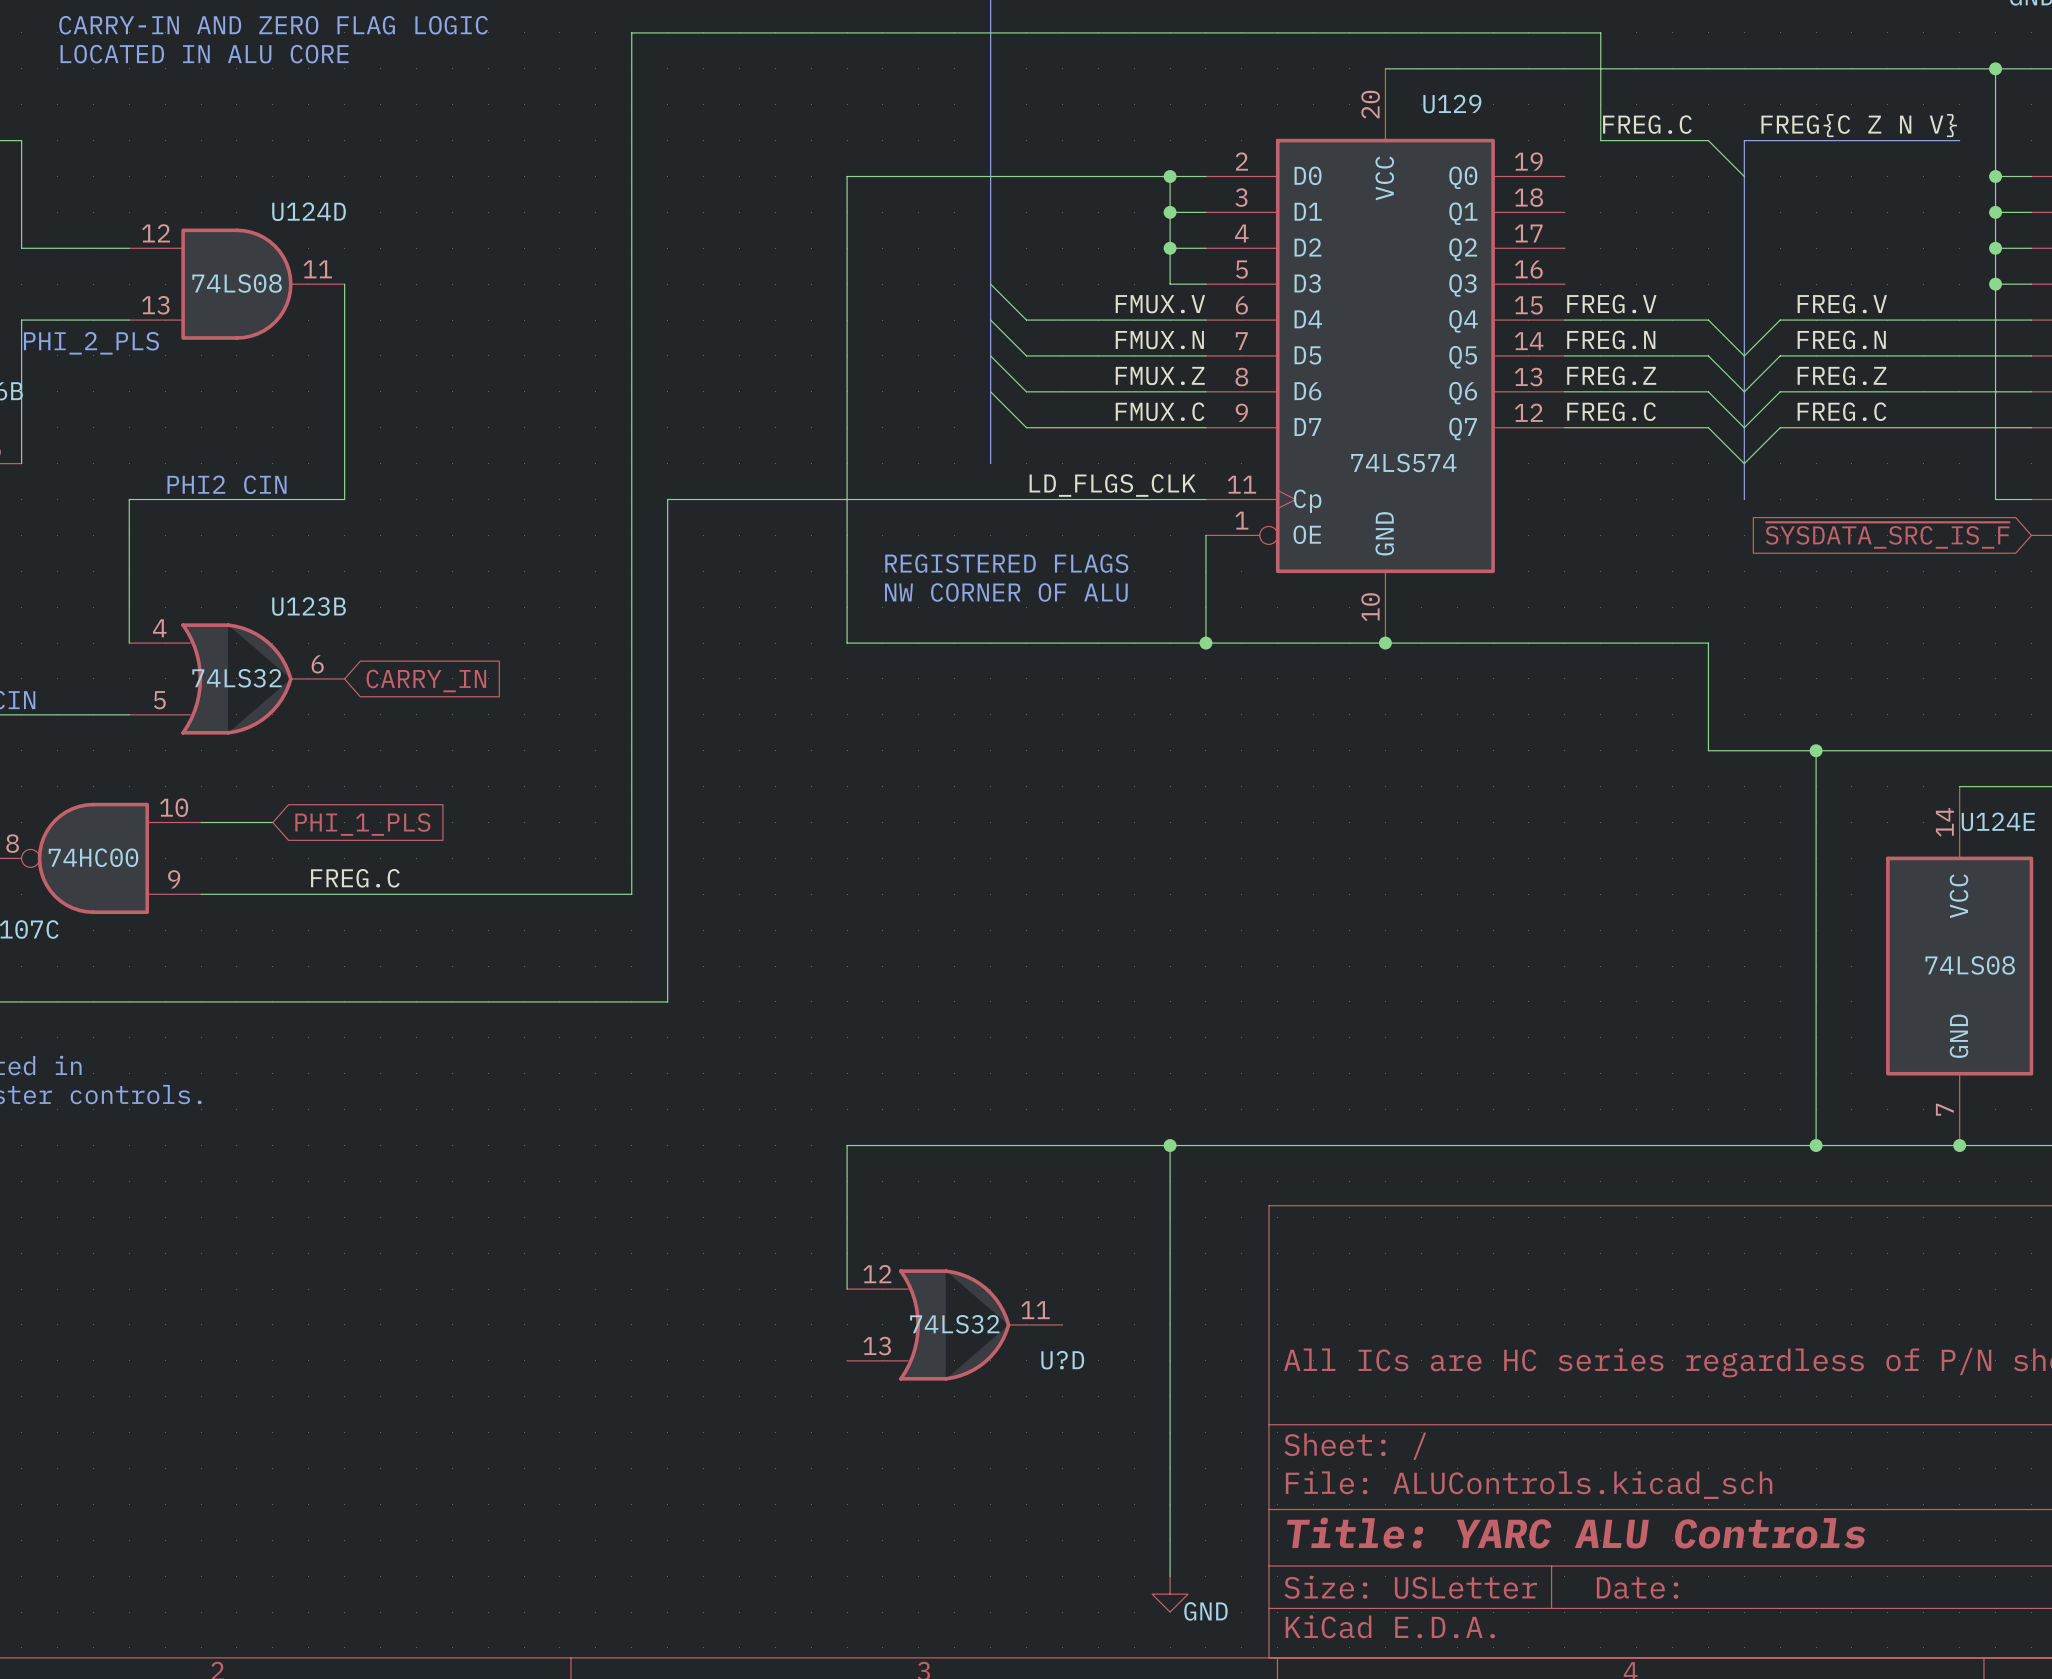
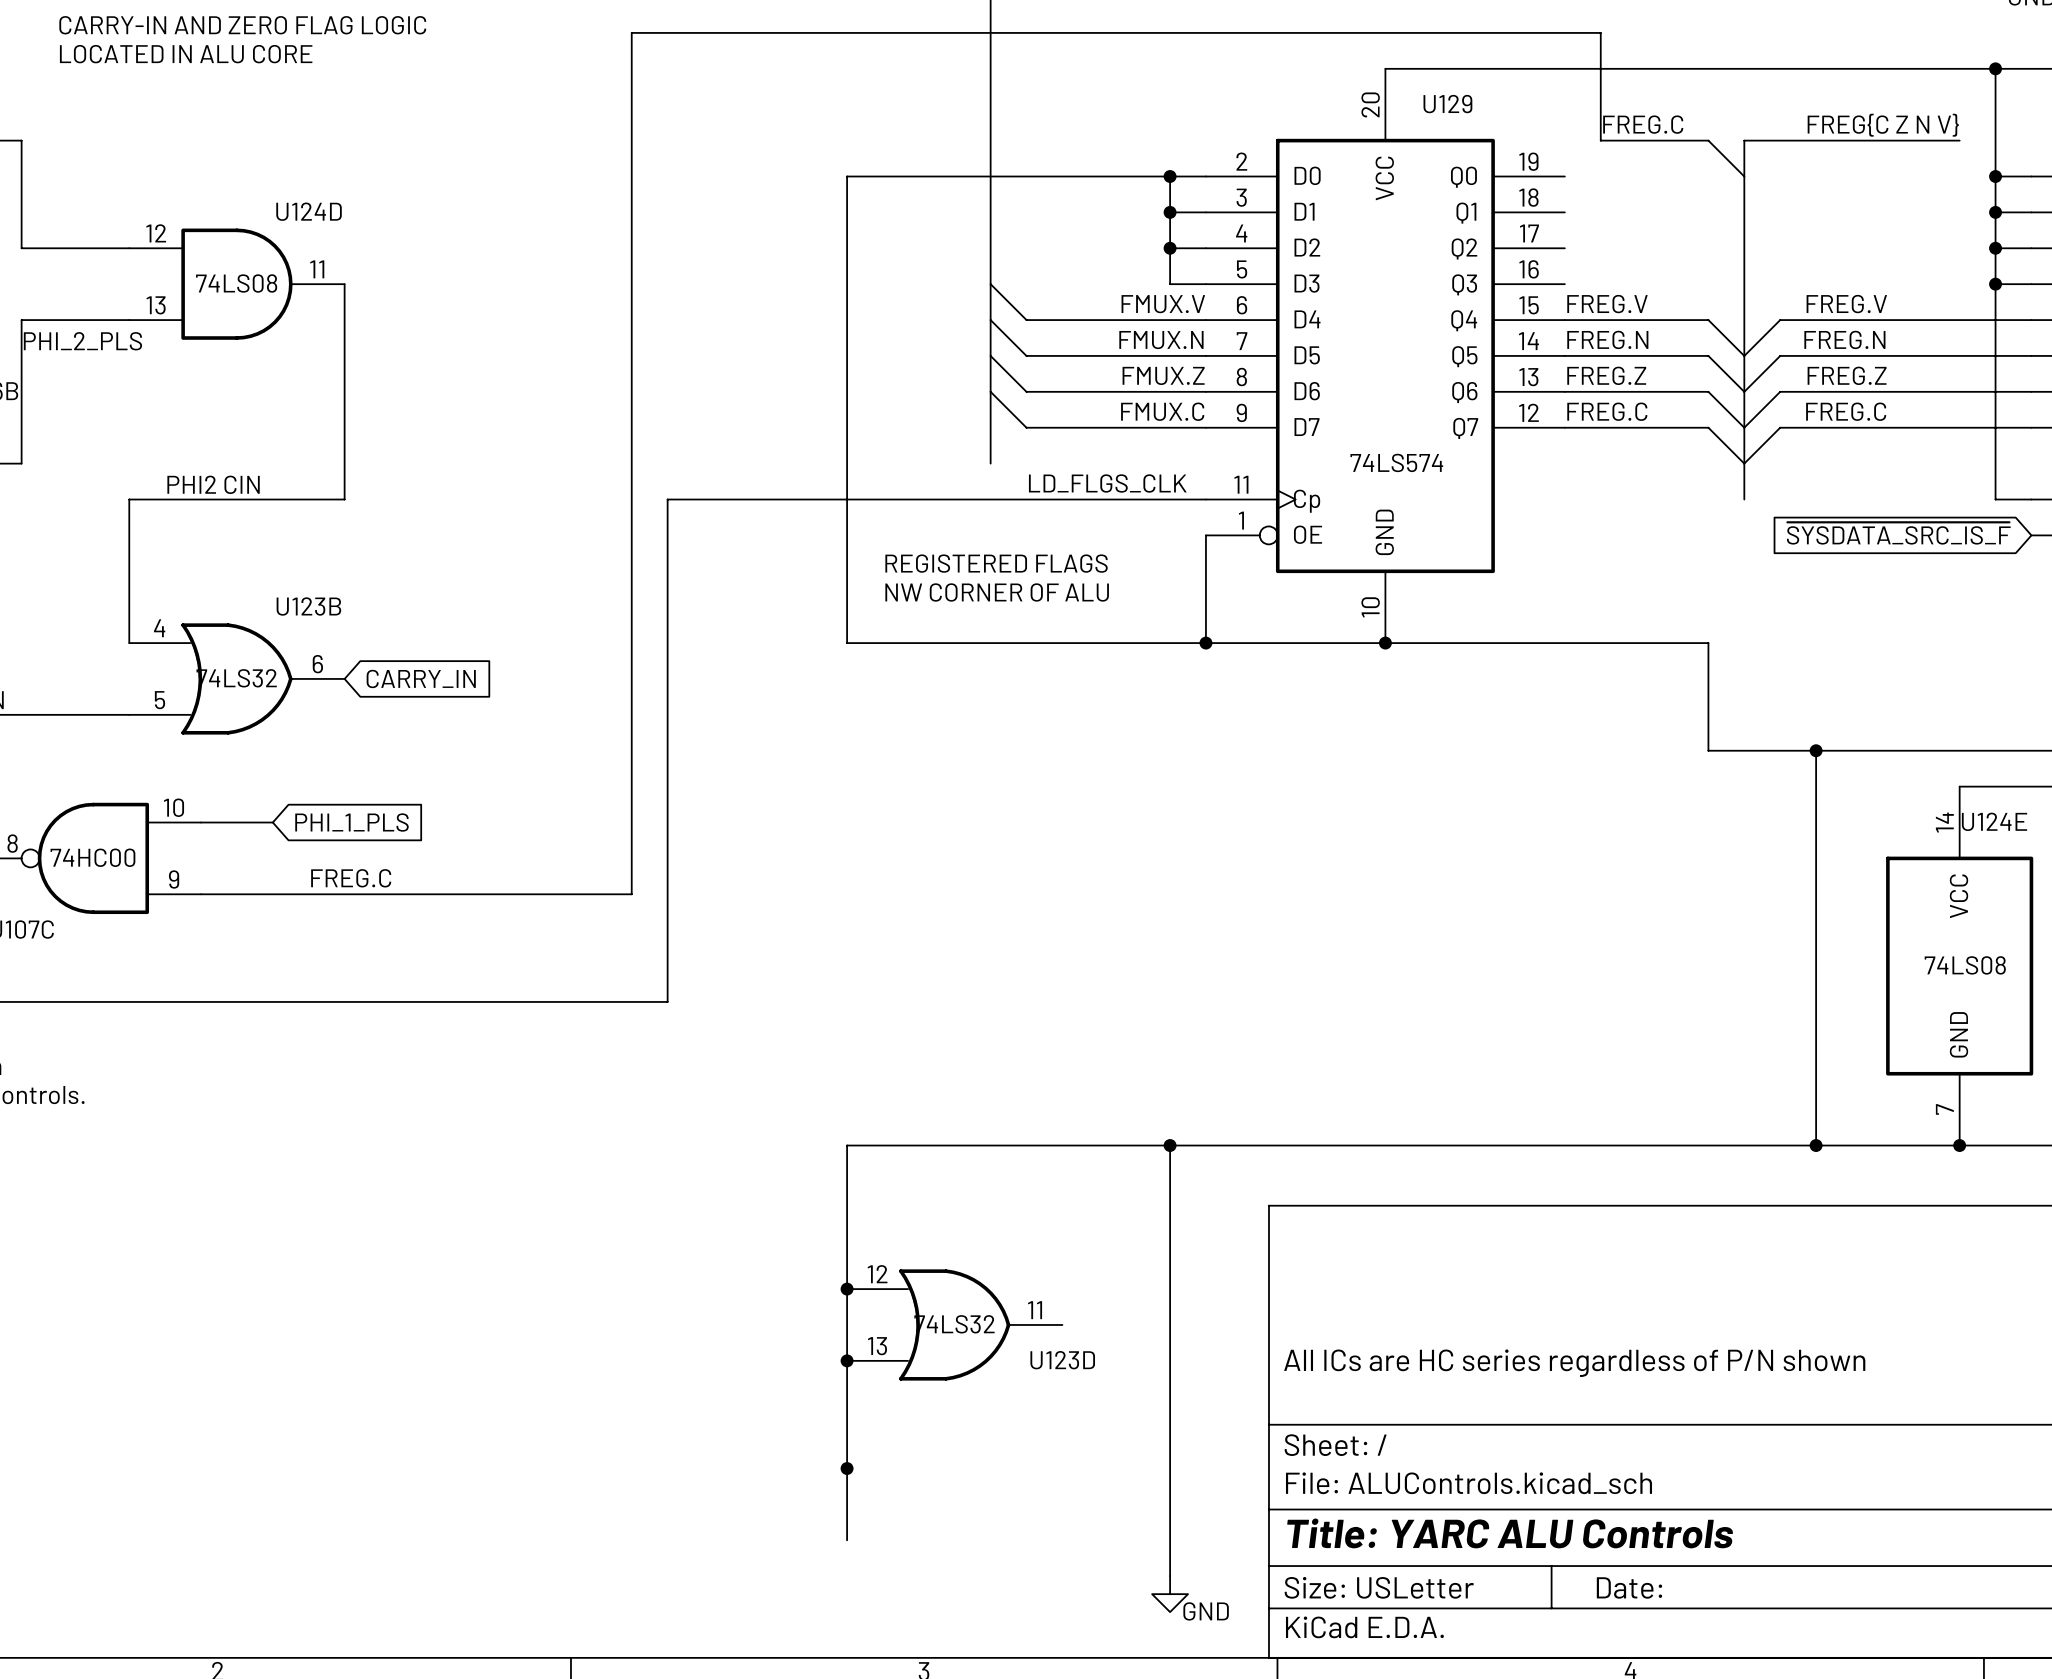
wire: none -> (847, 1289) (847, 1540)
junction: none -> (847, 1289)
junction: none -> (847, 1360)
U?D name: U?D (1062, 1360) -> U123D (1062, 1360)
junction: none -> (847, 1468)

